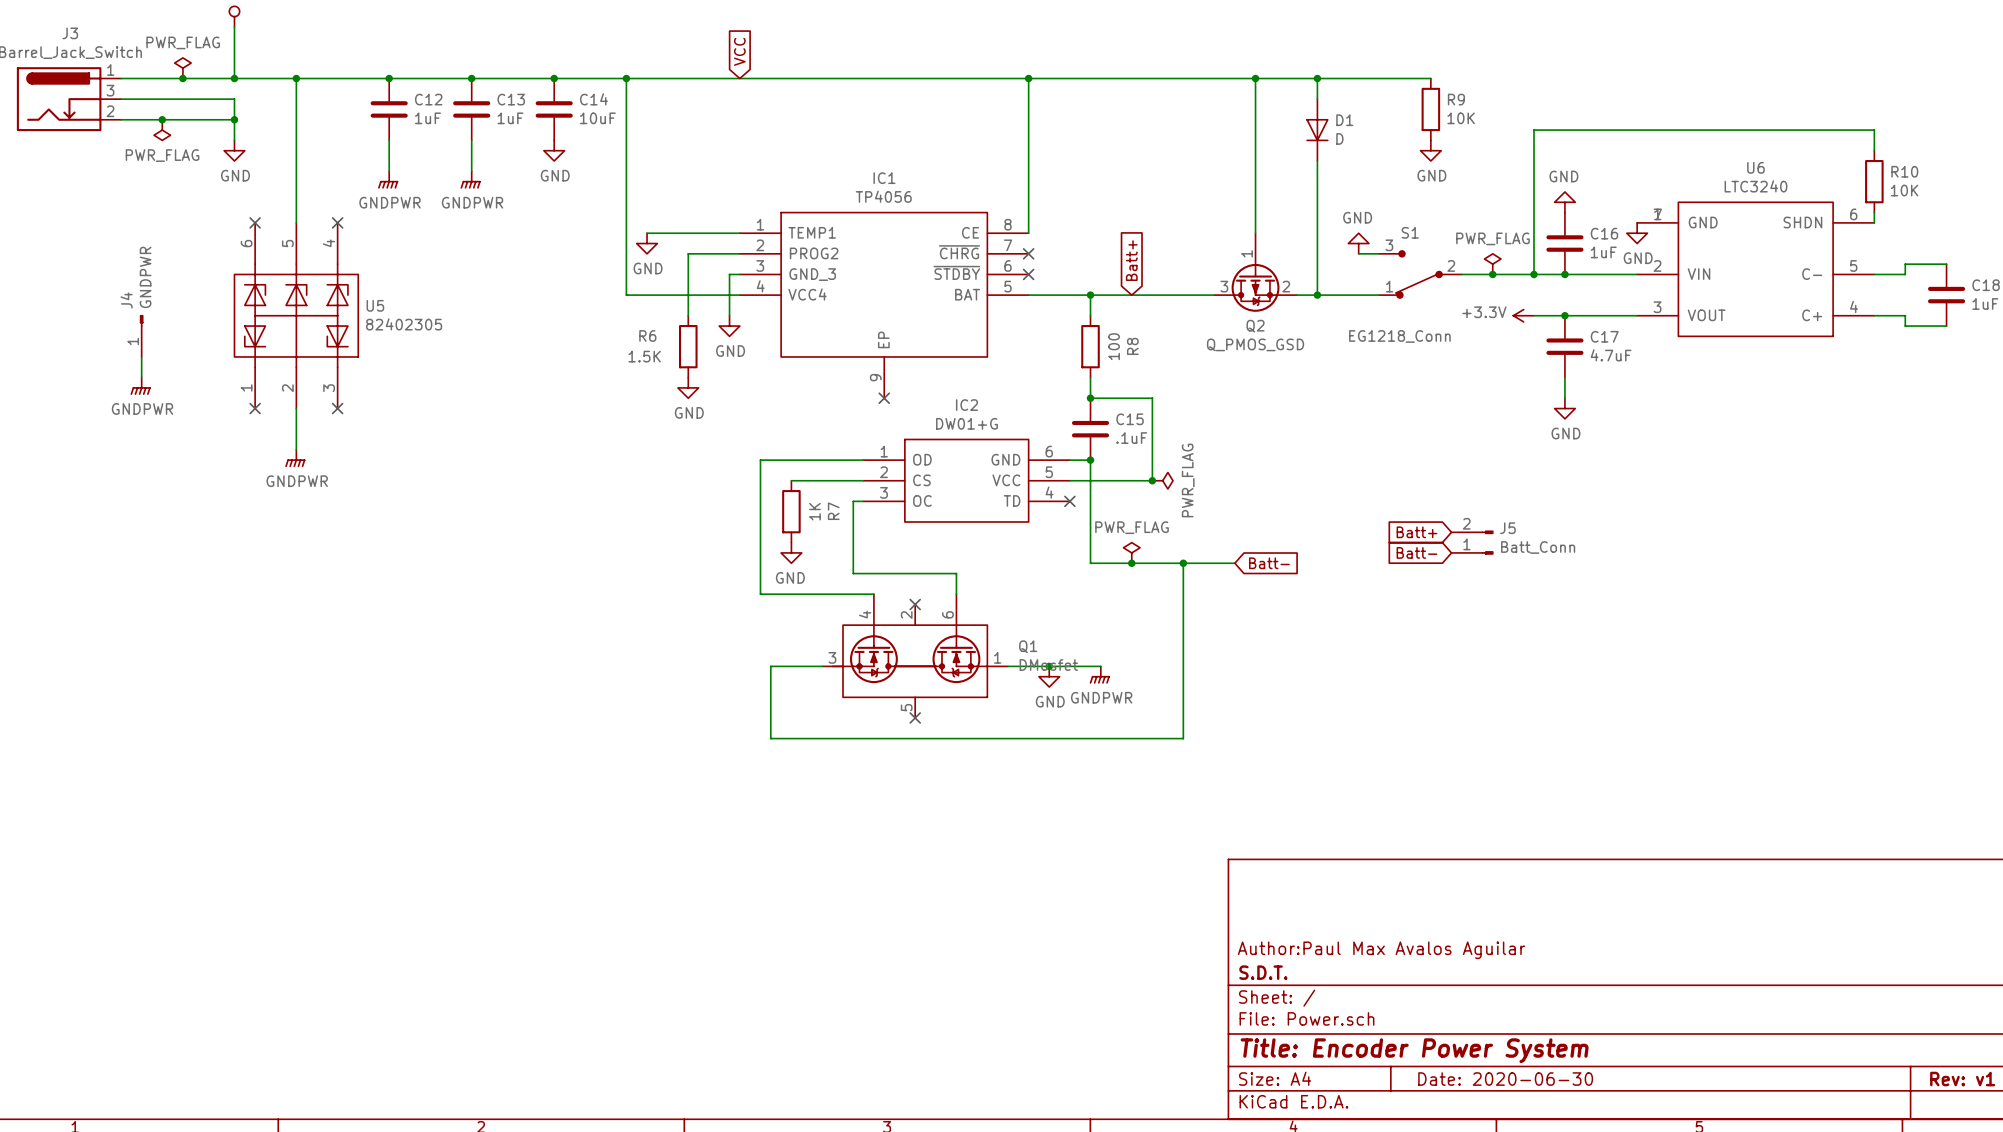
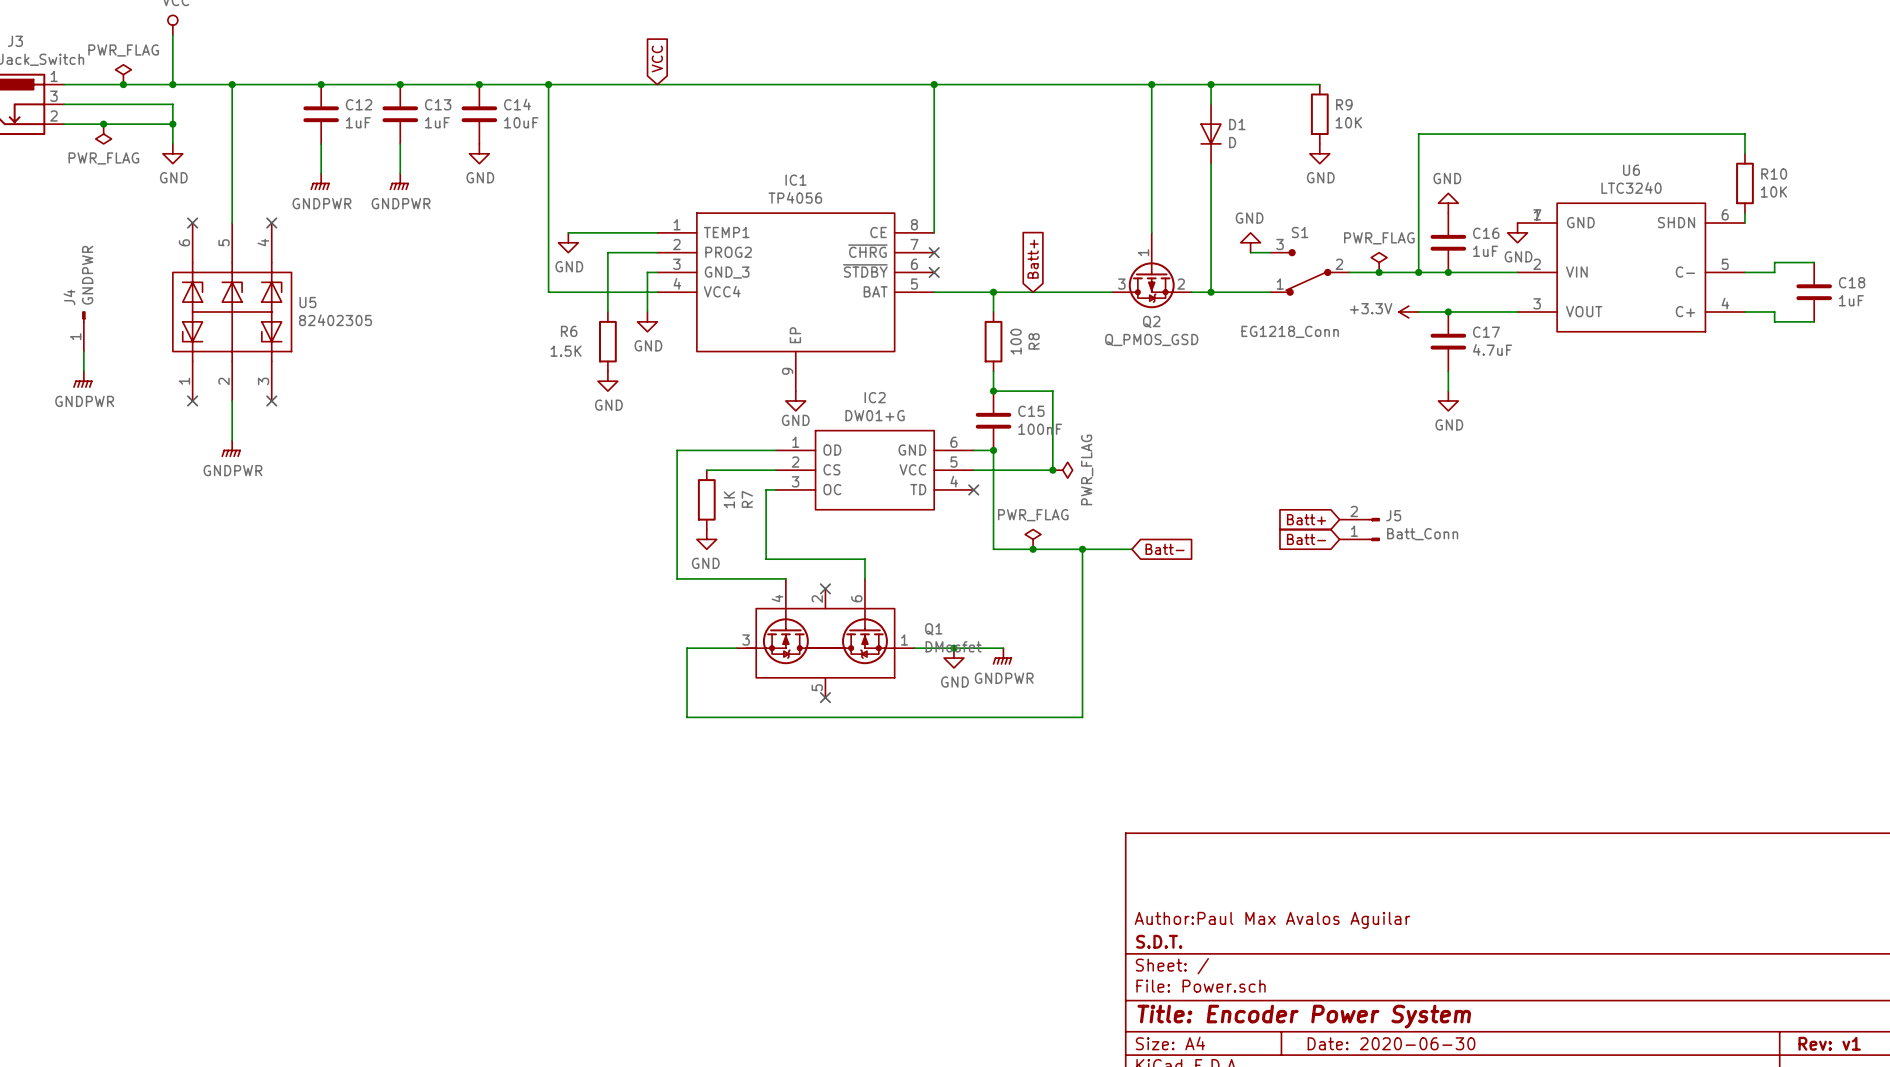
no-connect mark: (884, 398) -> none
power symbol: none -> GND (795, 400)
C15 value: .1uF (1131, 438) -> 100nF (1040, 429)

